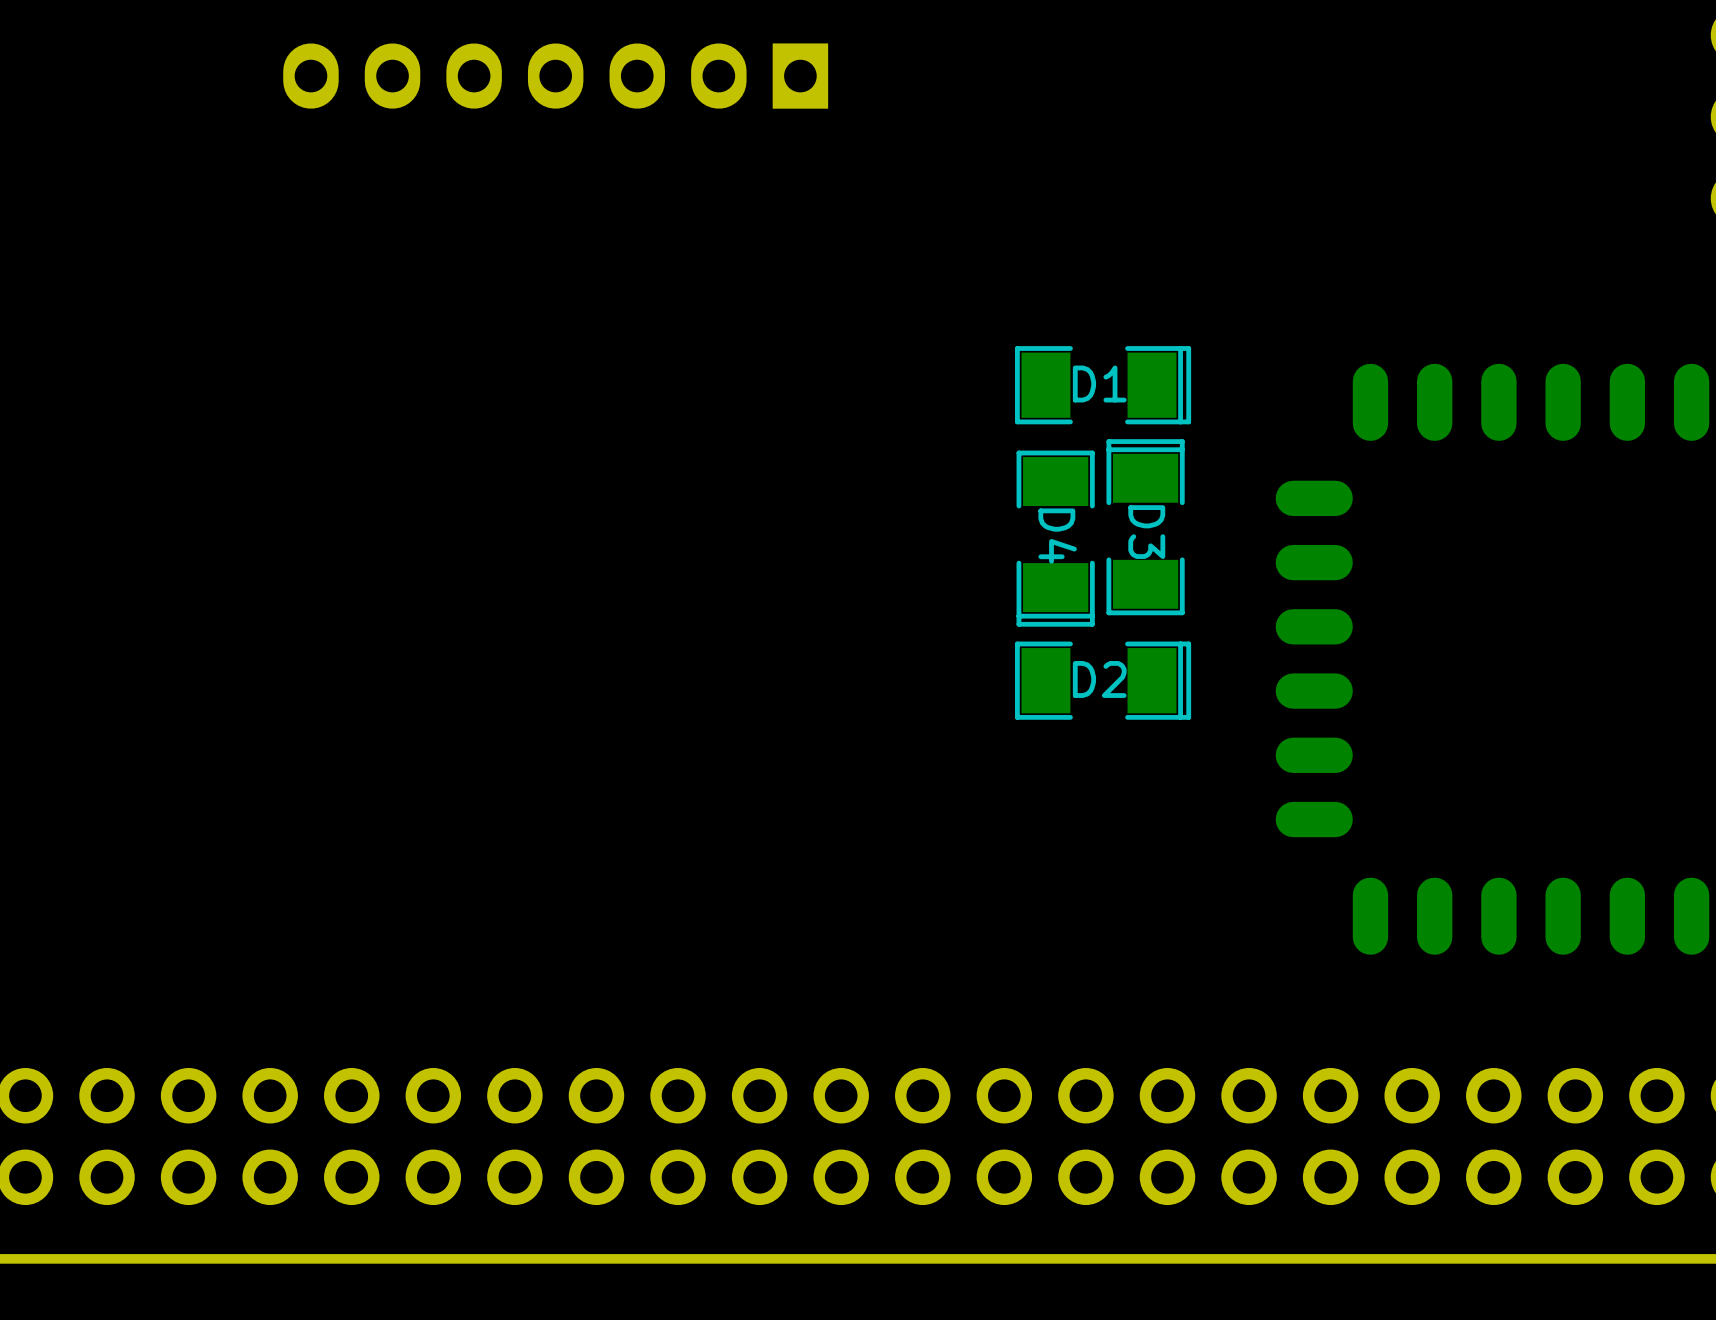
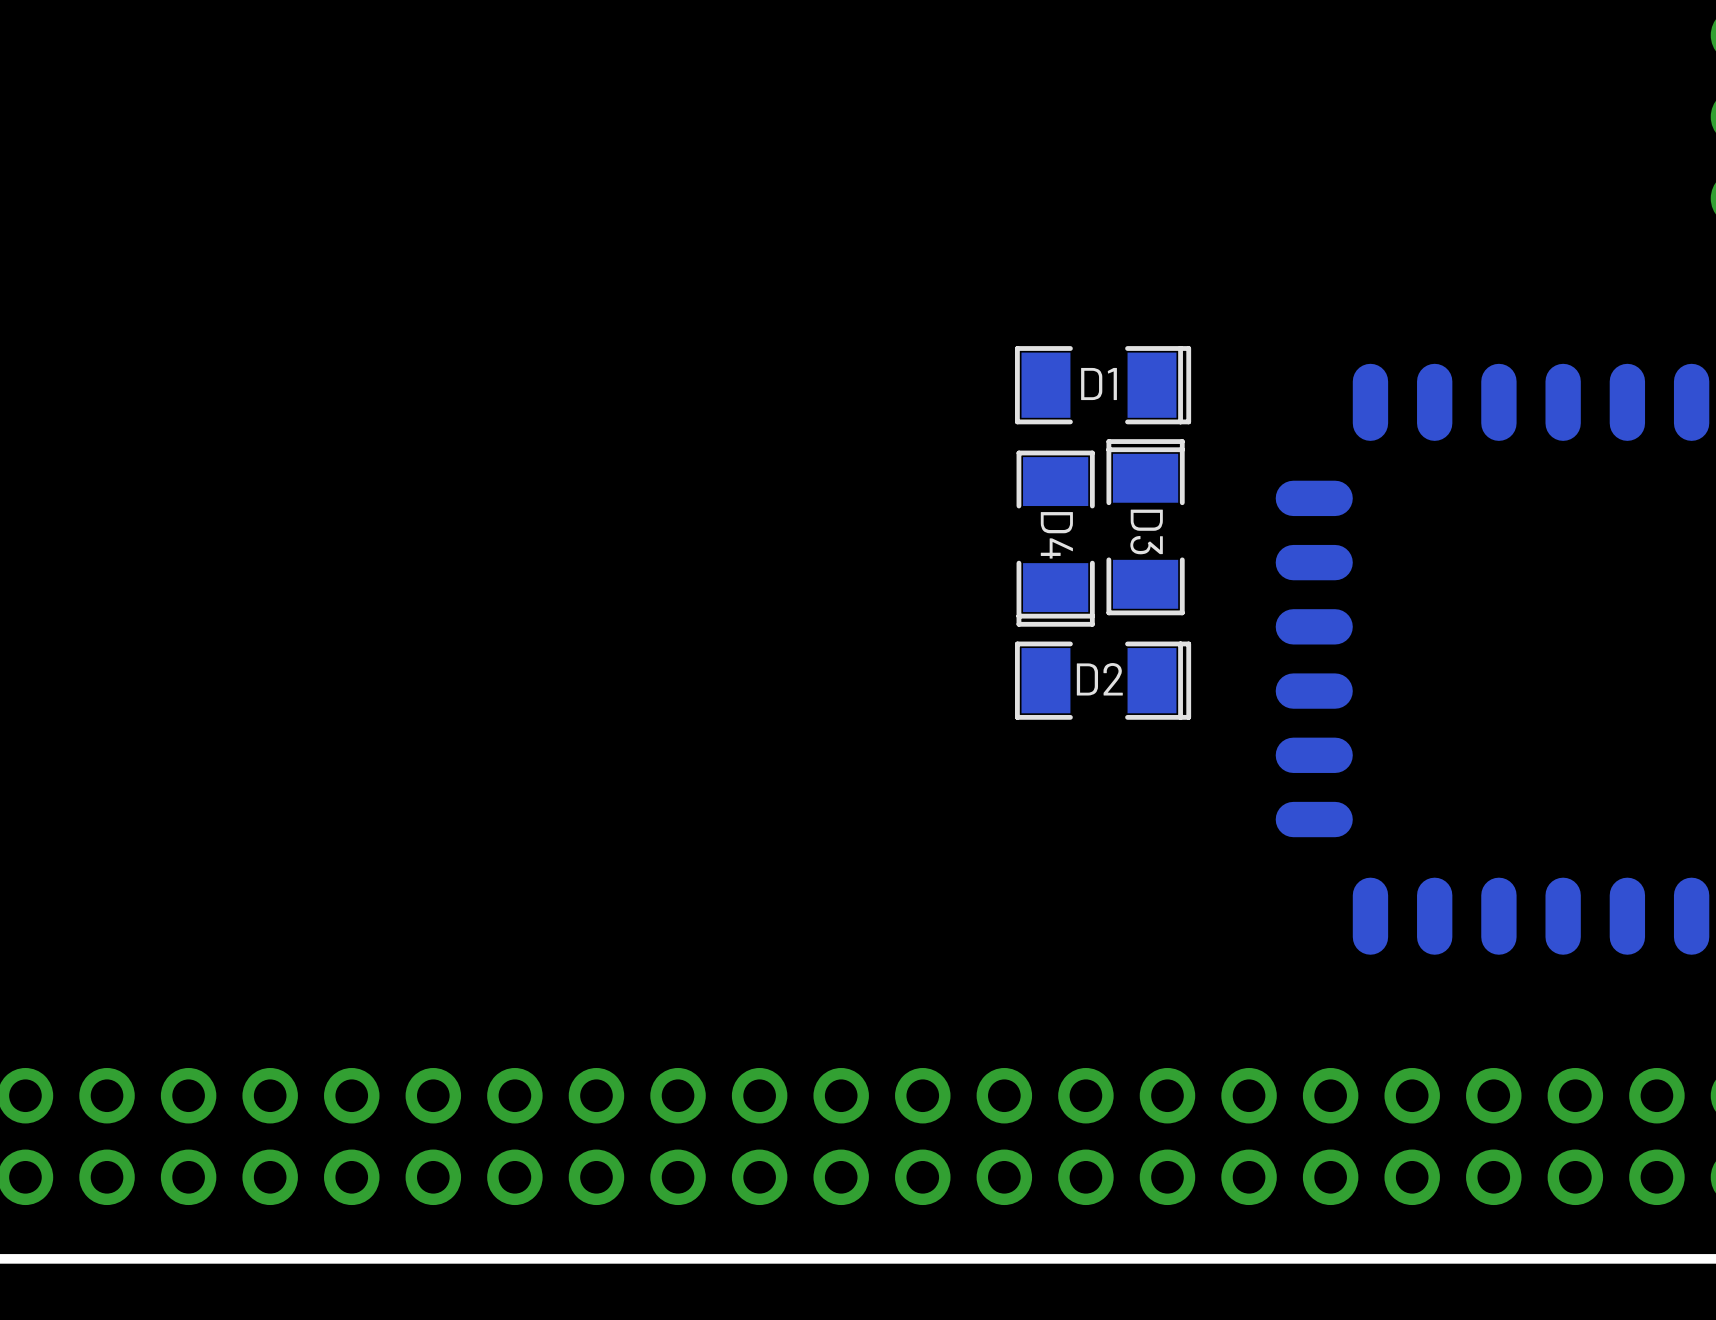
part: (555, 76) -> none

